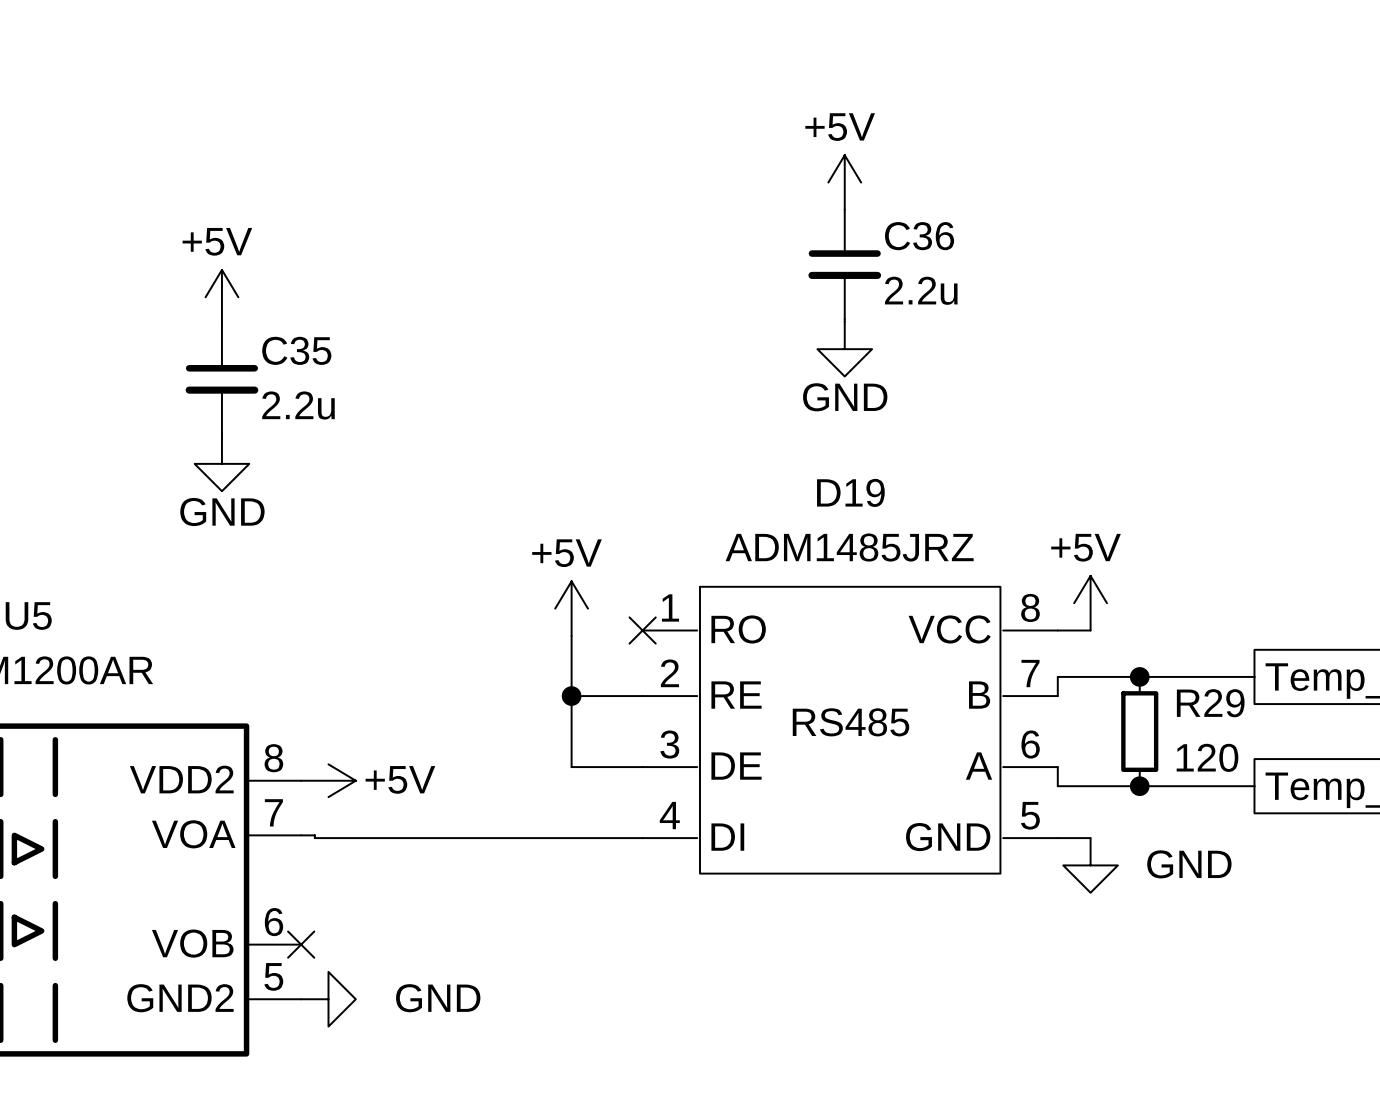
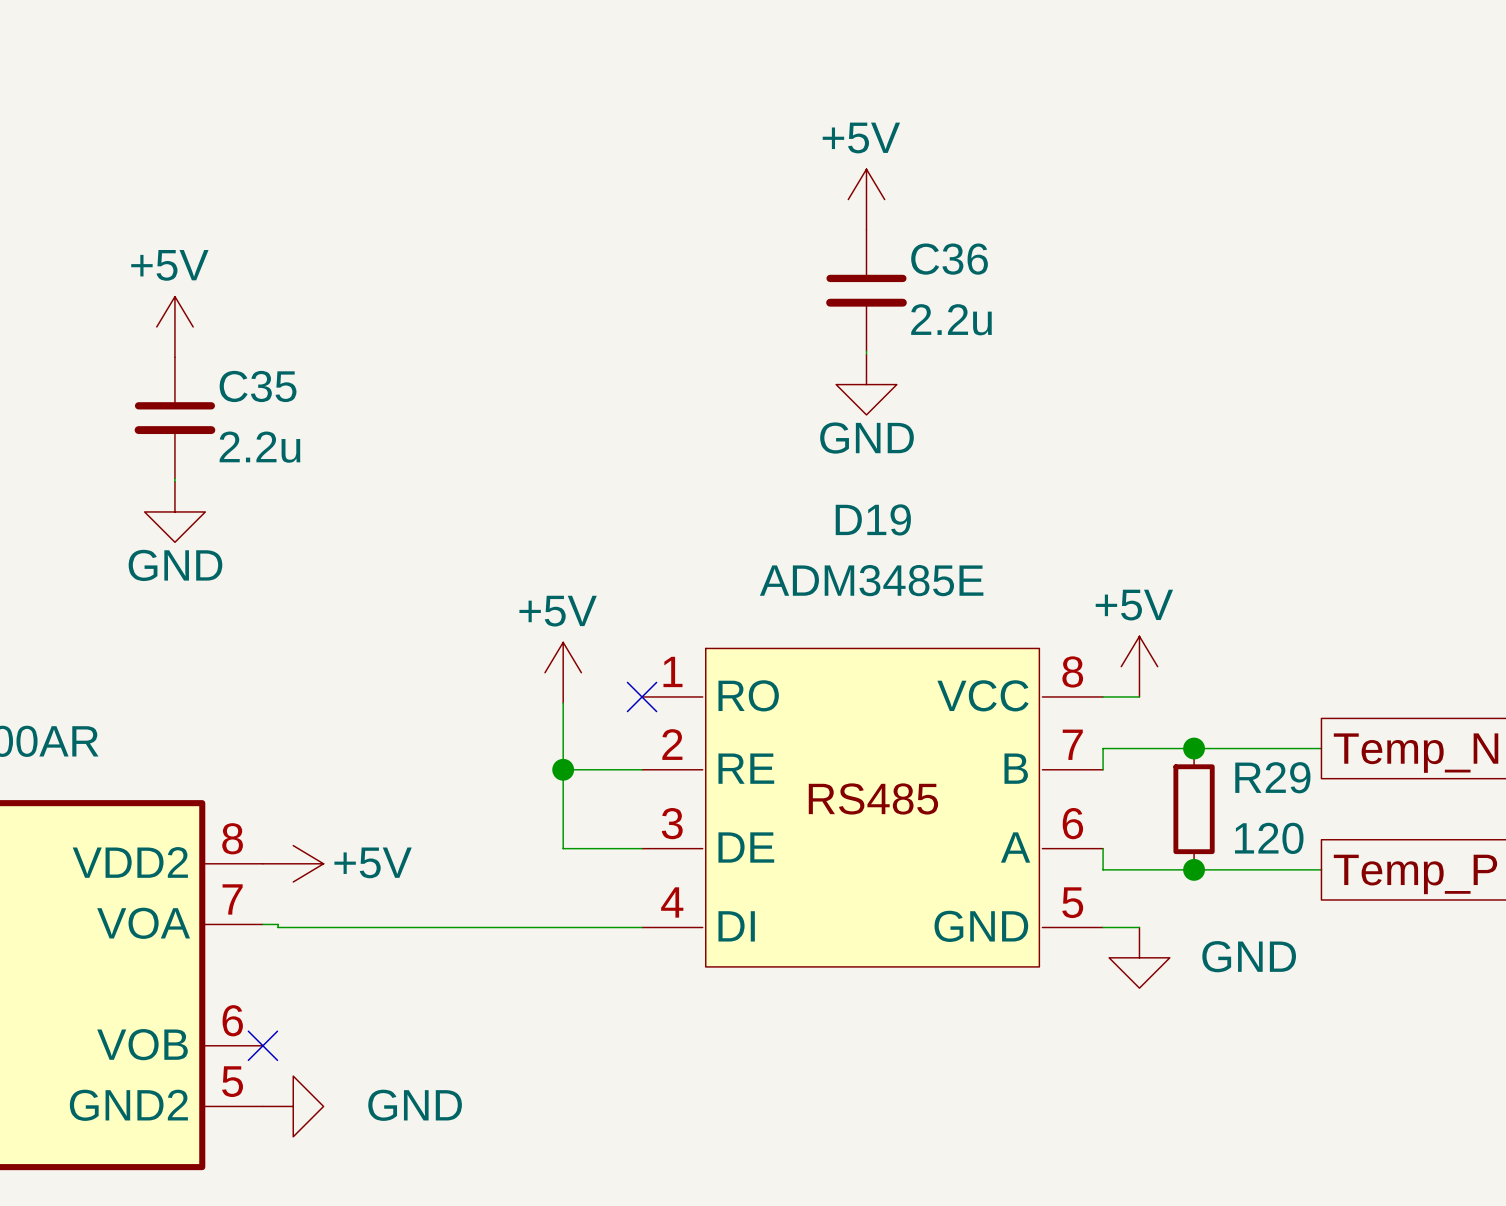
D19 name position: D19 (850, 492) -> D19 (873, 519)
D19 value: ADM1485JRZ (849, 547) -> ADM3485E (871, 580)

